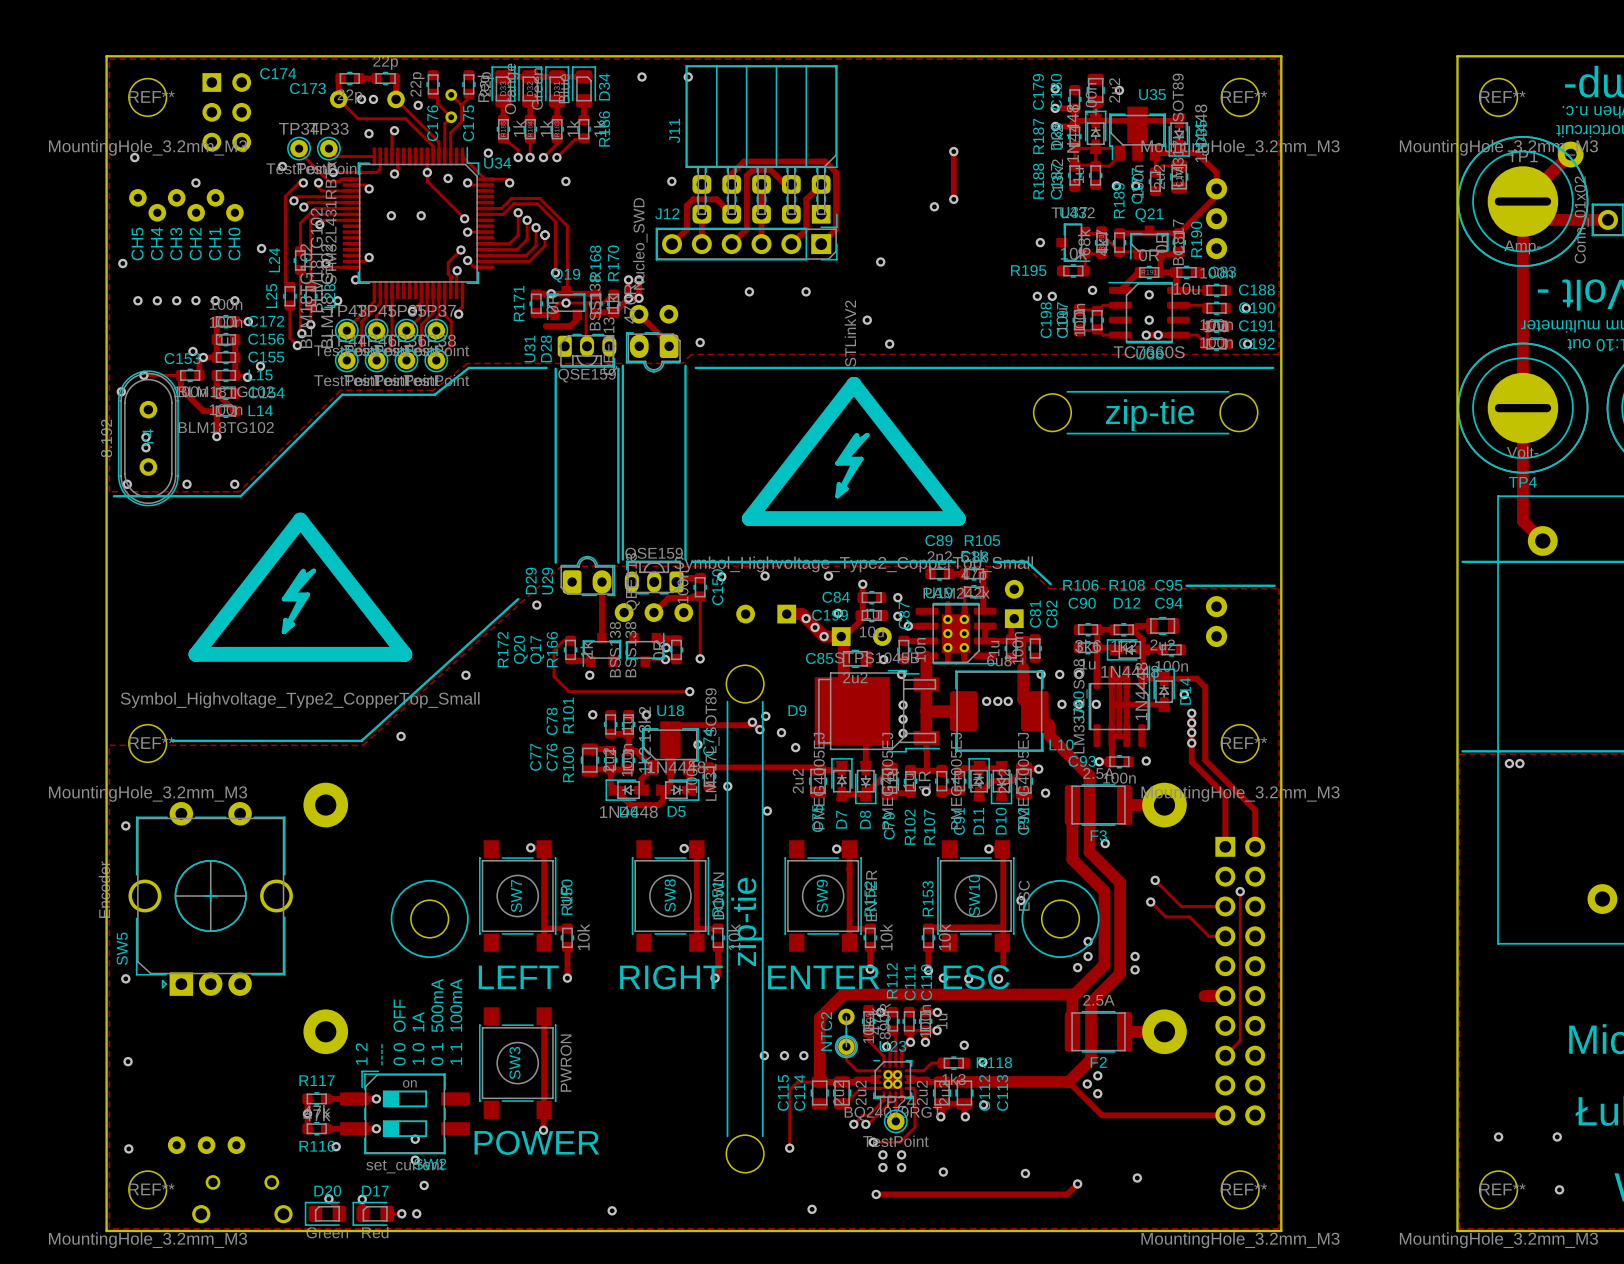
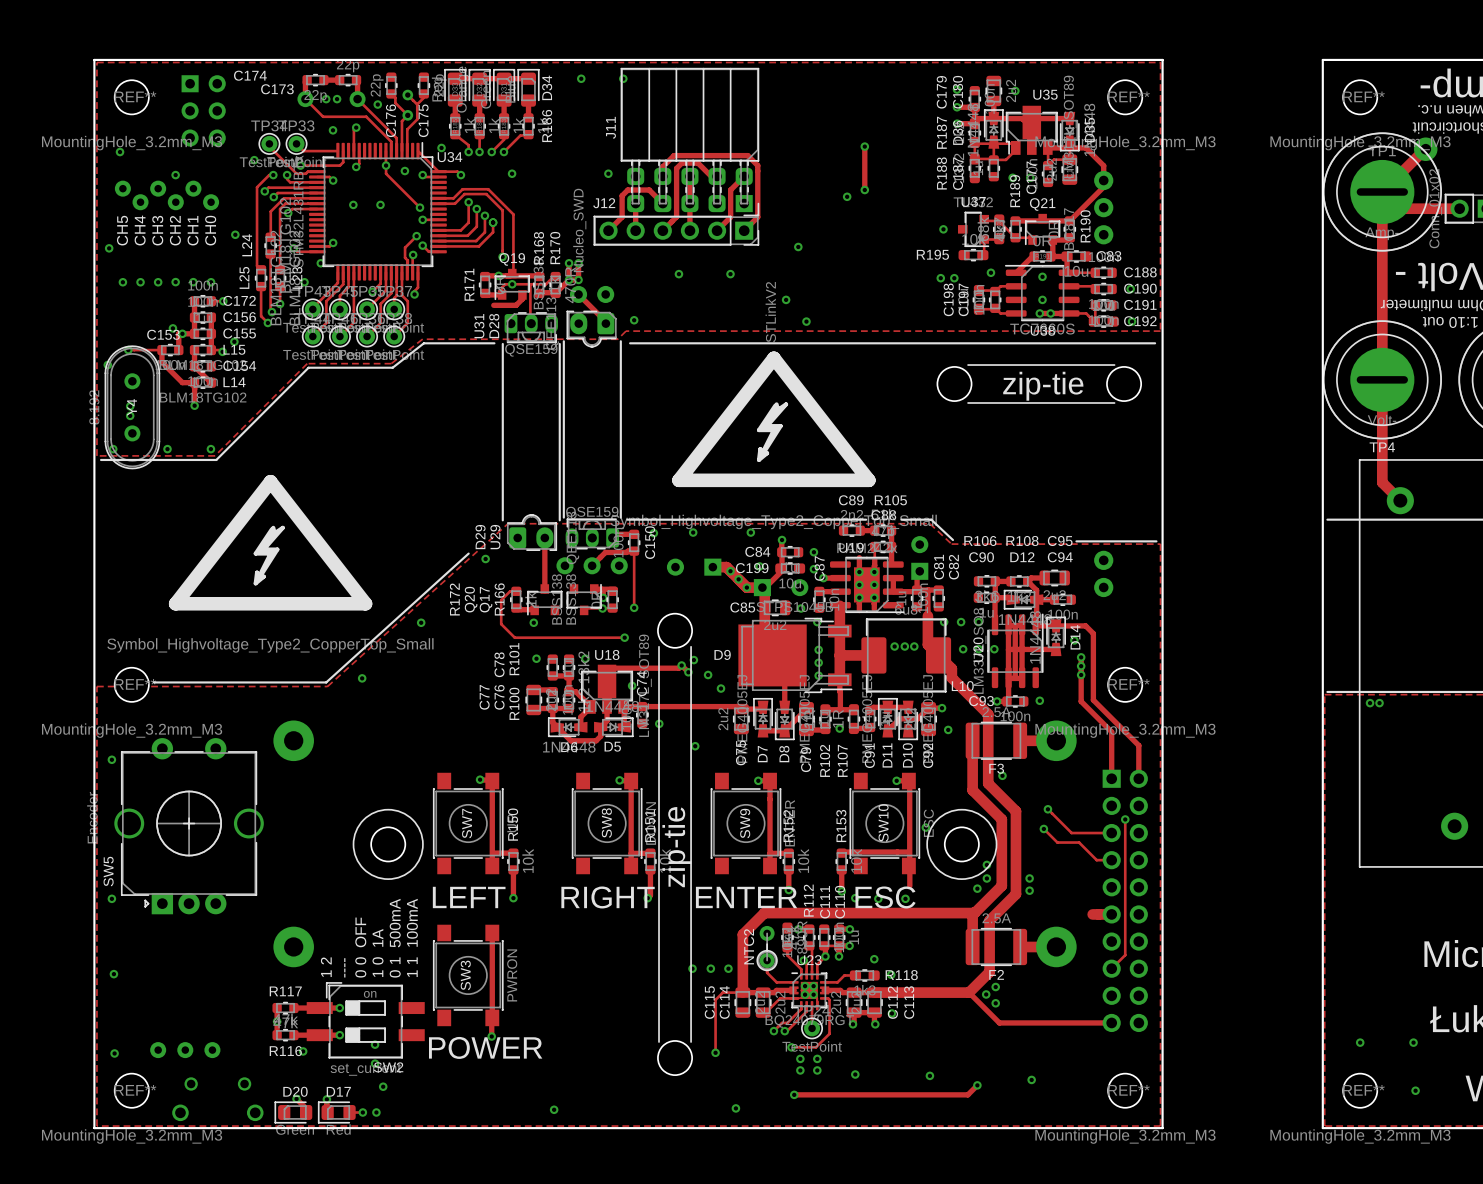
via: (1191, 743) -> none

